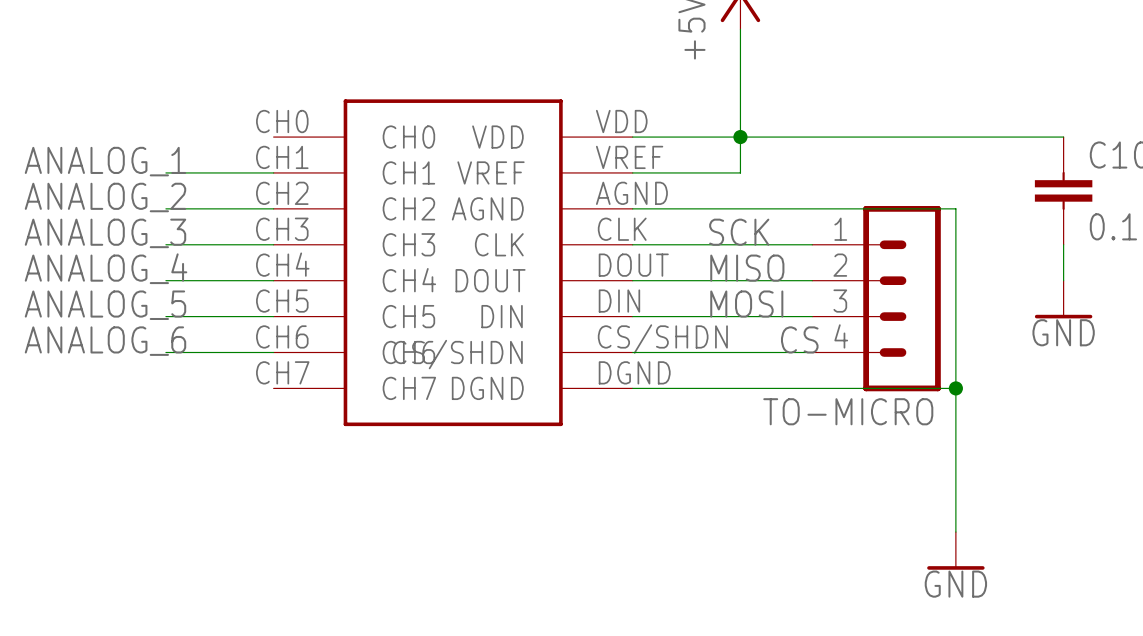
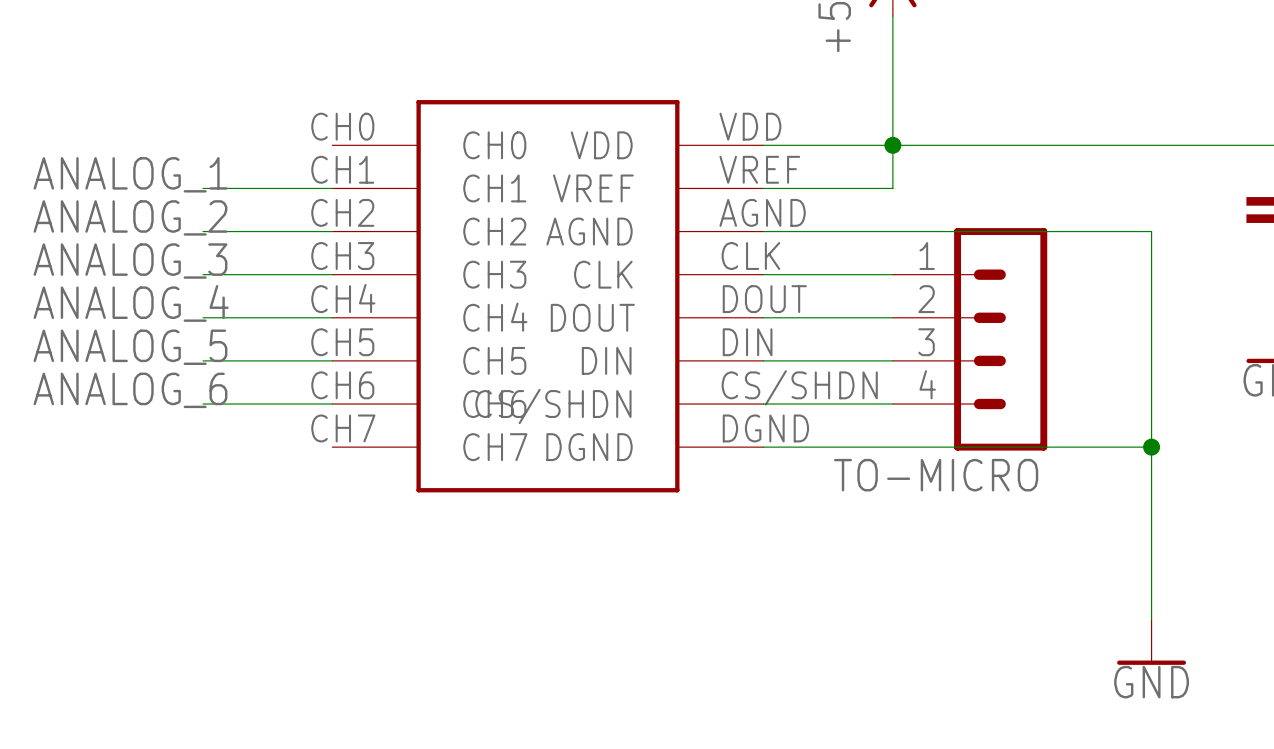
label: SCK (739, 232) -> none
label: MISO (747, 268) -> none
TO-MICRO position: (876, 298) -> (970, 339)
label: MOSI (746, 304) -> none
label: CS (799, 339) -> none

